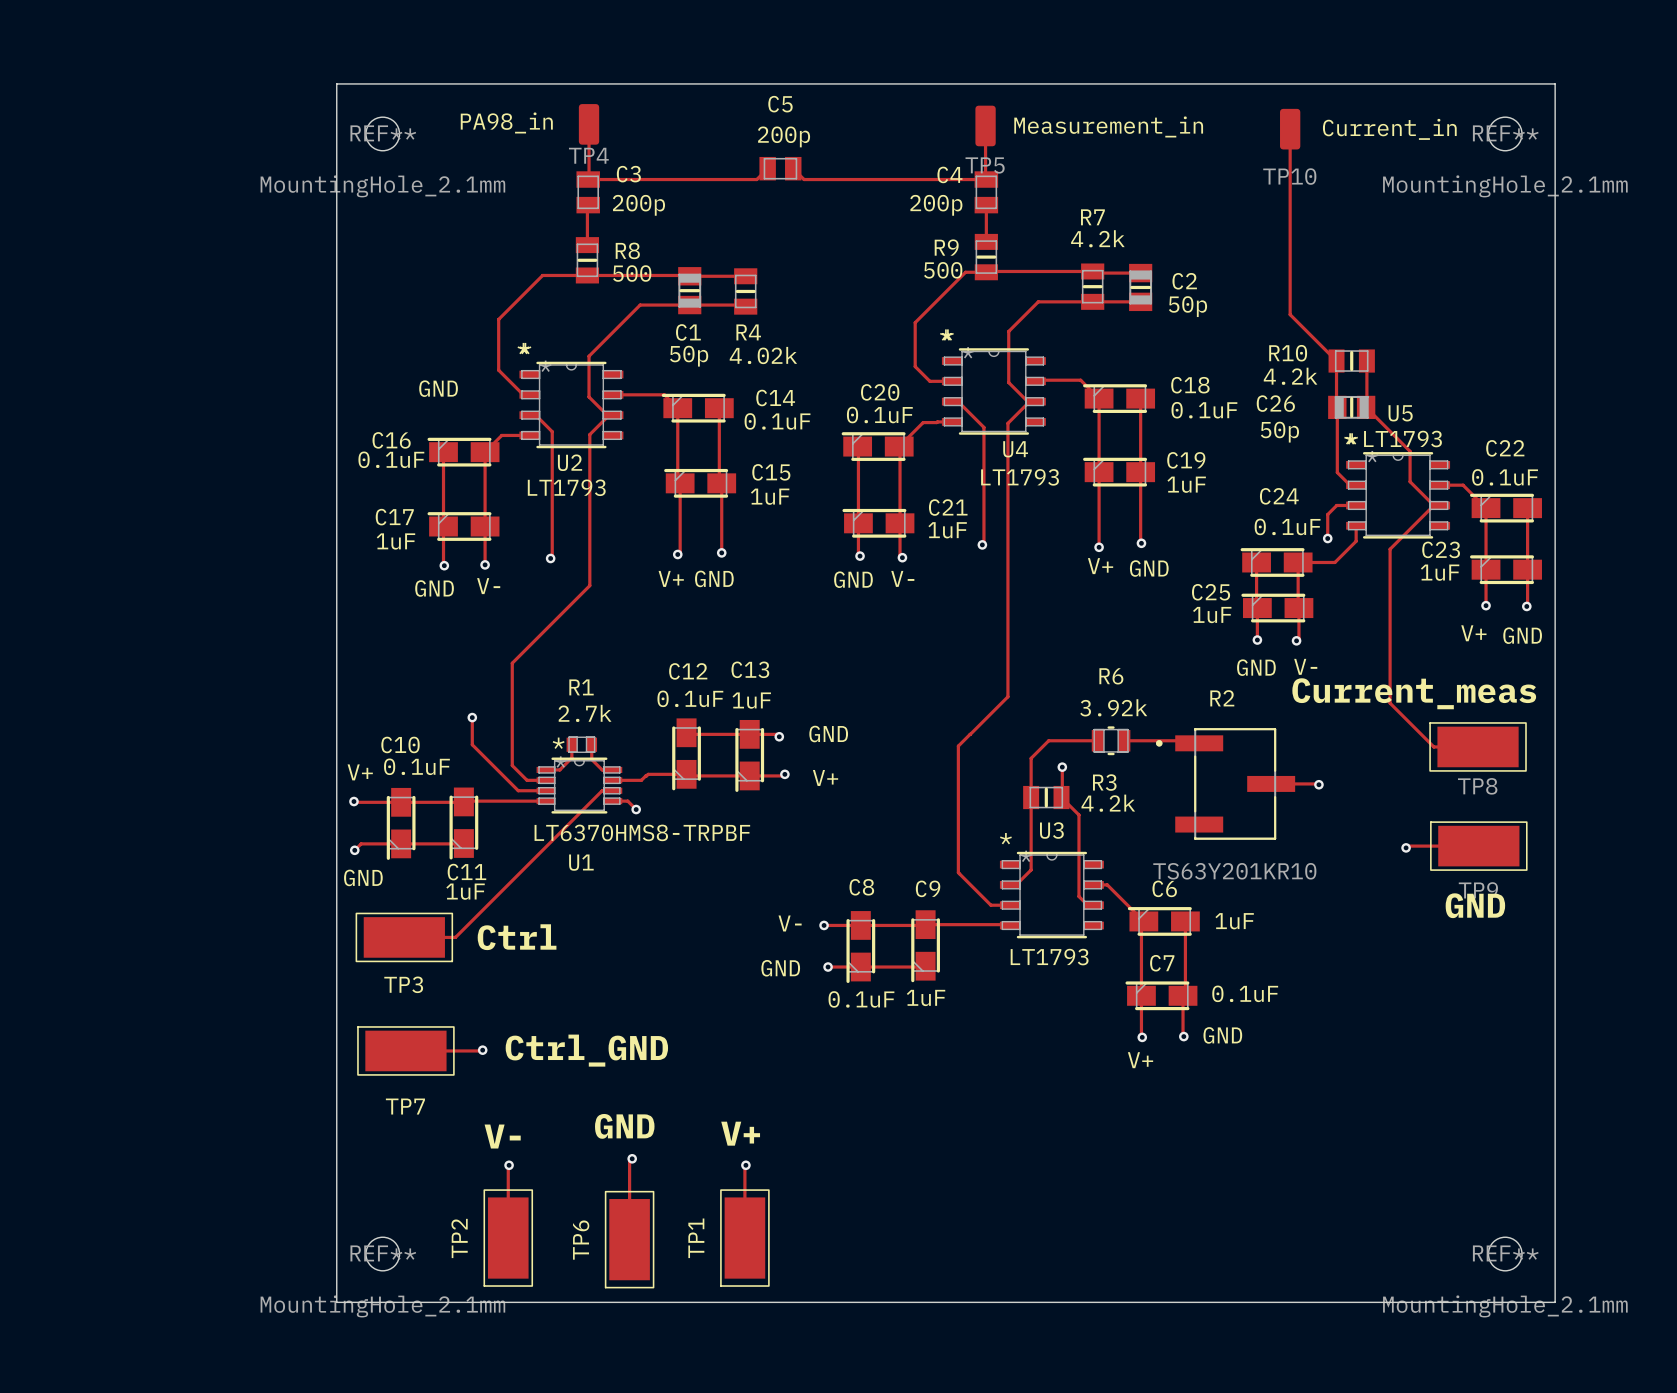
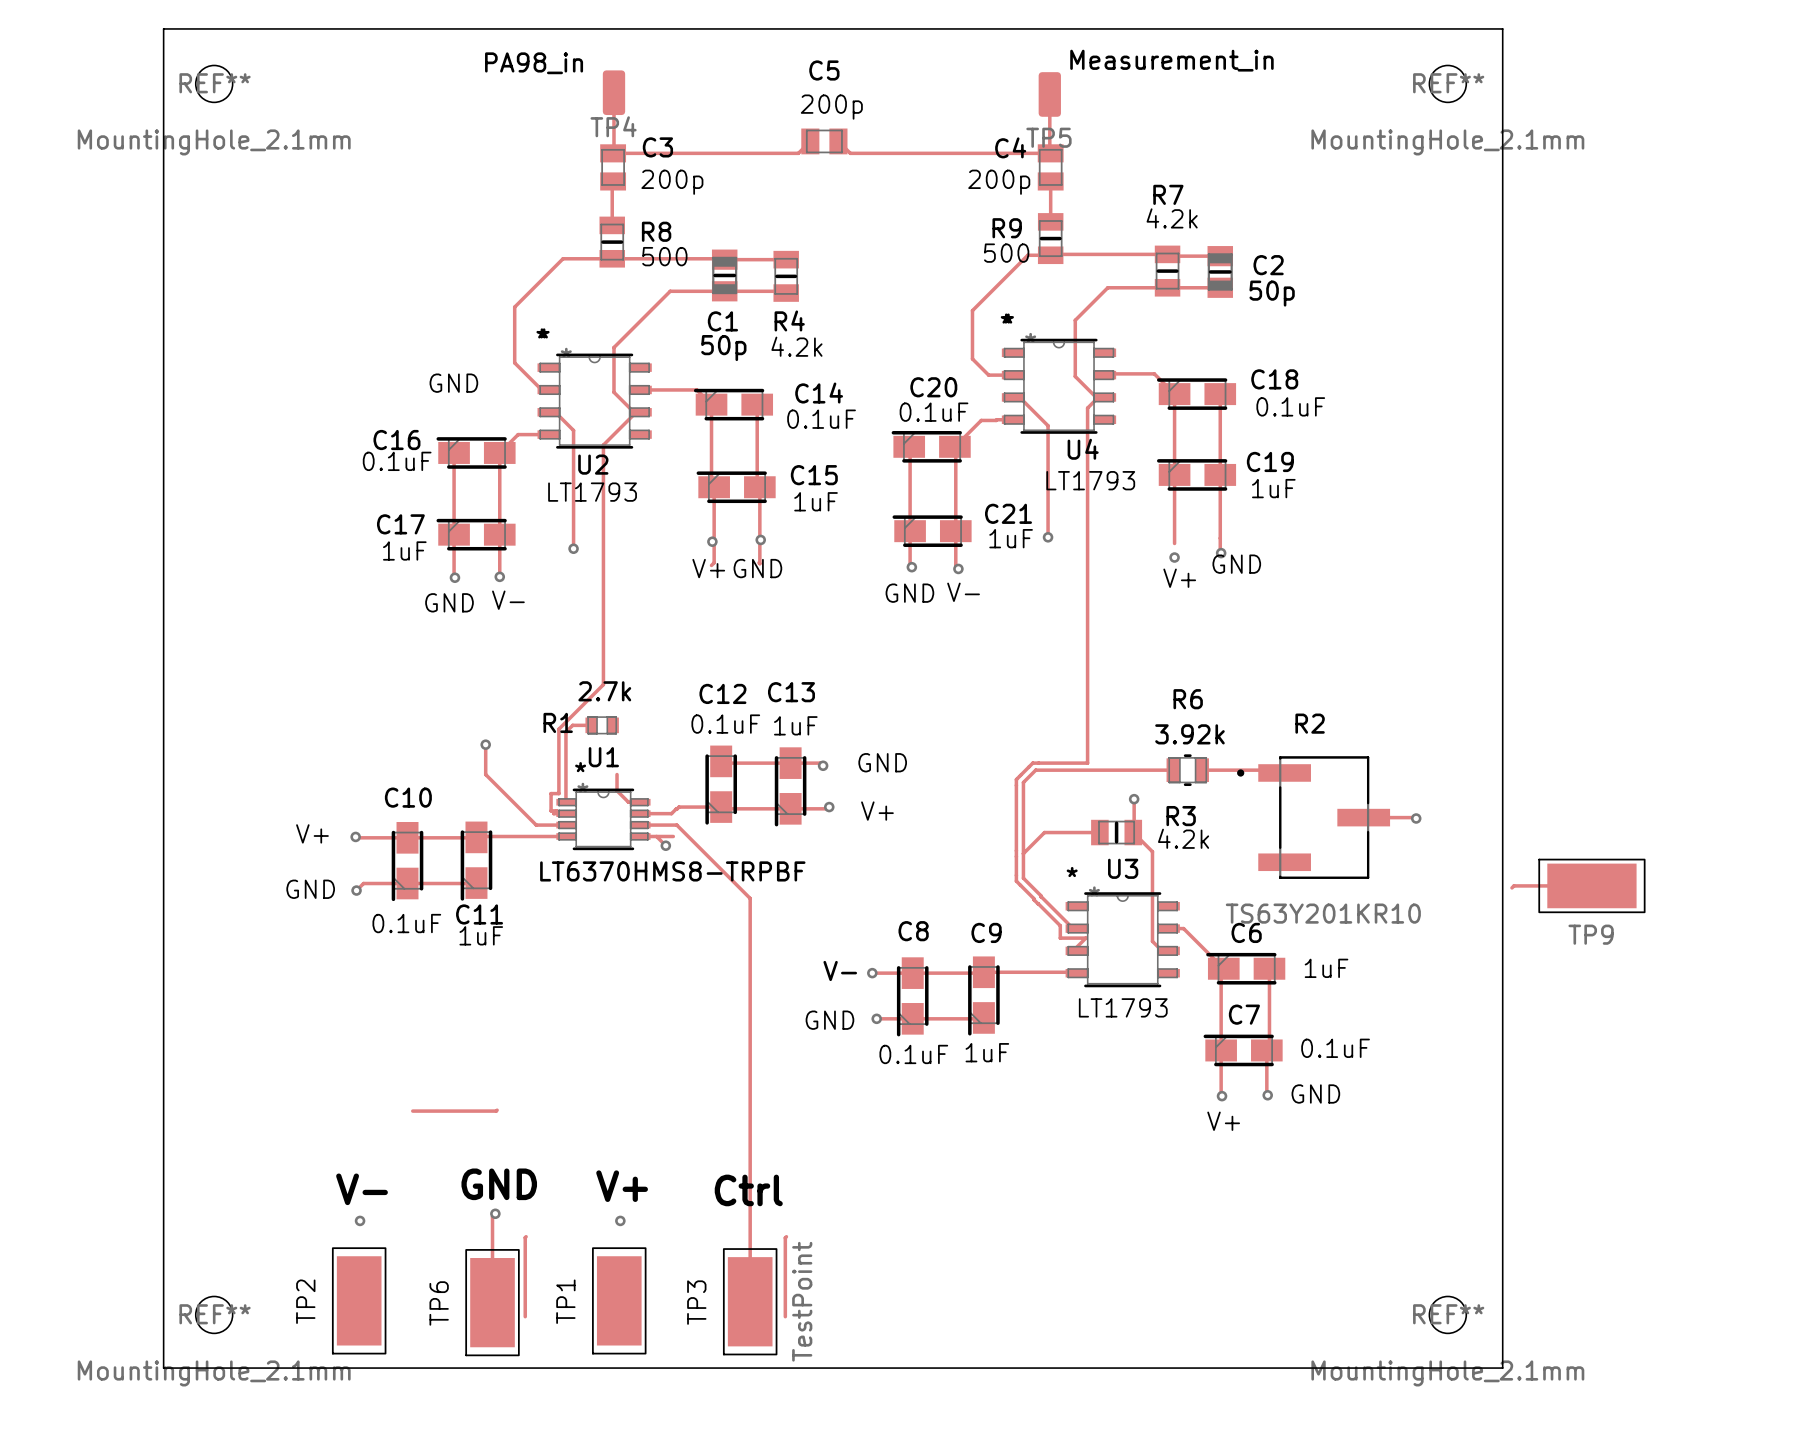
board edge: (336, 83) (1555, 83) (1555, 1302) (336, 1302) (336, 83) -> (163, 28) (1502, 28) (1502, 1368) (163, 1368) (163, 28)
text position: PA98_in (506, 122) -> PA98_in (534, 63)
text position: Measurement_in (1108, 126) -> Measurement_in (1171, 60)
track: (1290, 129) (1290, 314) (1336, 361) (1337, 472) (1349, 485) (1356, 485) -> none
TP10: (1290, 129) -> none
text: Current_in (1389, 129) -> none
REF** position: (382, 133) -> (214, 83)
REF** position: (1505, 133) -> (1447, 83)
R4 text: 4.02k (763, 355) -> 4.2k (796, 346)
R10: (1351, 361) -> none
track: (1366, 361) (1366, 407) (1410, 451) (1410, 481) (1433, 505) -> none
C26: 50p (1351, 407) -> none
track: (1019, 411) (1007, 423) (1007, 696) (970, 734) -> (1087, 408) (1087, 763) (1033, 763)
track: (589, 434) (589, 585) (512, 663) (512, 765) (527, 780) (545, 780) -> (614, 433) (603, 445) (603, 684) (558, 729) (558, 793) (551, 793) (551, 810) (556, 810) (553, 813) (565, 813)
track: (1440, 485) (1463, 485) (1486, 508) (1486, 605) -> none
U5: (1398, 495) -> none
track: (1356, 505) (1336, 505) (1327, 514) (1327, 538) -> none
track: (1433, 505) (1390, 549) (1390, 703) (1433, 746) (1478, 746) -> none
C22: (1506, 508) -> none
track: (1527, 508) (1526, 606) -> none
track: (1356, 525) (1356, 541) (1334, 562) (1298, 562) (1298, 638) (1296, 640) -> none
track: (983, 528) (982, 544) -> none
track: (1099, 534) (1099, 547) -> none
via: (1327, 538) -> none
track: (552, 539) (550, 558) -> none
via position: (982, 544) -> (1048, 537)
via position: (721, 552) -> (760, 539)
via position: (677, 554) -> (712, 541)
via position: (550, 558) -> (573, 548)
track: (1256, 562) (1257, 640) -> none
C24: (1276, 562) -> none
text position: GND (1149, 568) -> GND (1236, 564)
C23: (1506, 569) -> none
text position: V+ (671, 578) -> V+ (708, 568)
text position: GND (714, 578) -> GND (757, 568)
via: (1486, 605) -> none
via: (1526, 606) -> none
C25: (1277, 608) -> none
text: V+ (1473, 633) -> none
text: GND (1522, 635) -> none
via: (1257, 640) -> none
via: (1296, 640) -> none
text: V- (1305, 666) -> none
text: GND (1256, 667) -> none
R1 name position: R1 (581, 687) -> R1 (558, 722)
text: Current_meas (1414, 693) -> none
track: (1048, 740) (1031, 758) (1031, 869) (1016, 884) (1009, 884) -> (1119, 770) (1035, 770) (1023, 782) (1023, 878) (1040, 896)
C10 name position: C10 (400, 744) -> C10 (408, 797)
track: (571, 744) (571, 757) (559, 769) (545, 769) -> (591, 725) (572, 725) (565, 732) (565, 802)
R1 position: (581, 744) -> (602, 725)
track: (958, 746) (958, 872) (990, 905) (1003, 905) -> (1019, 776) (1016, 779) (1016, 881) (1060, 925) (1060, 938) (1085, 938) (1073, 950)
TP8: (1478, 746) -> none
C10 text position: 0.1uF (416, 766) -> 0.1uF (406, 923)
text position: V+ (360, 772) -> V+ (312, 833)
track: (613, 790) (602, 790) (455, 937) (404, 937) -> (640, 825) (676, 825) (750, 898) (750, 1301)
track: none -> (1099, 832) (1044, 832) (1023, 853)
via: (1406, 847) -> none
track: none -> (1041, 896) (1073, 928)
U1 name position: U1 (581, 862) -> U1 (603, 757)
text position: GND (363, 877) -> GND (310, 889)
text: GND (1475, 905) -> none
TP3 rotation: 0° (404, 937) -> 90° clockwise (750, 1301)
TP3 position: (404, 937) -> (750, 1301)
text position: Ctrl (517, 937) -> Ctrl (748, 1190)
TP7: (405, 1050) -> none
via: (482, 1050) -> none
text: Ctrl_GND (586, 1050) -> none
text: none -> GND (499, 1184)
text: GND (624, 1126) -> none
text position: V+ (740, 1133) -> V+ (622, 1186)
text position: V- (502, 1136) -> V- (362, 1189)
via: none -> (360, 1220)
track: (632, 1158) (629, 1161) (629, 1239) -> (495, 1213) (492, 1216) (492, 1302)
via position: (632, 1158) -> (620, 1220)
via position: (509, 1165) -> (495, 1213)
via: (745, 1165) -> none
TP3 value: none -> TestPoint (802, 1301)
TP2 position: (508, 1238) -> (359, 1300)
TP1 position: (744, 1238) -> (619, 1300)
TP6 position: (629, 1239) -> (492, 1302)
REF** position: (382, 1254) -> (214, 1314)
REF** position: (1505, 1254) -> (1447, 1314)

